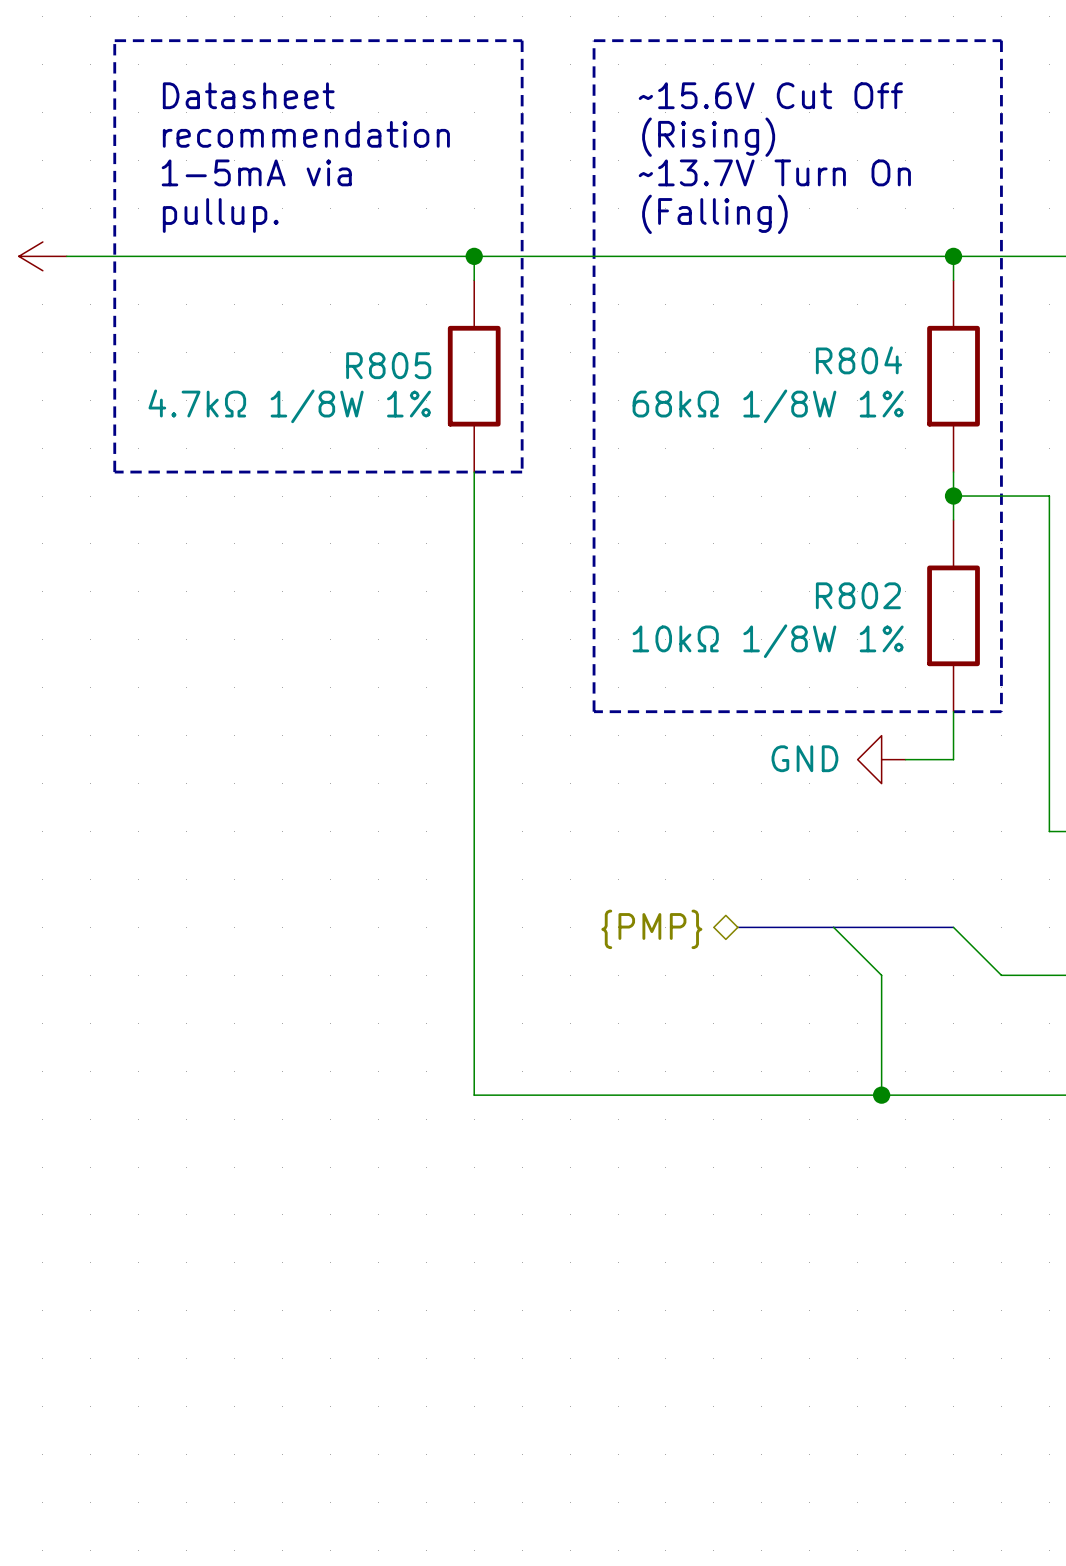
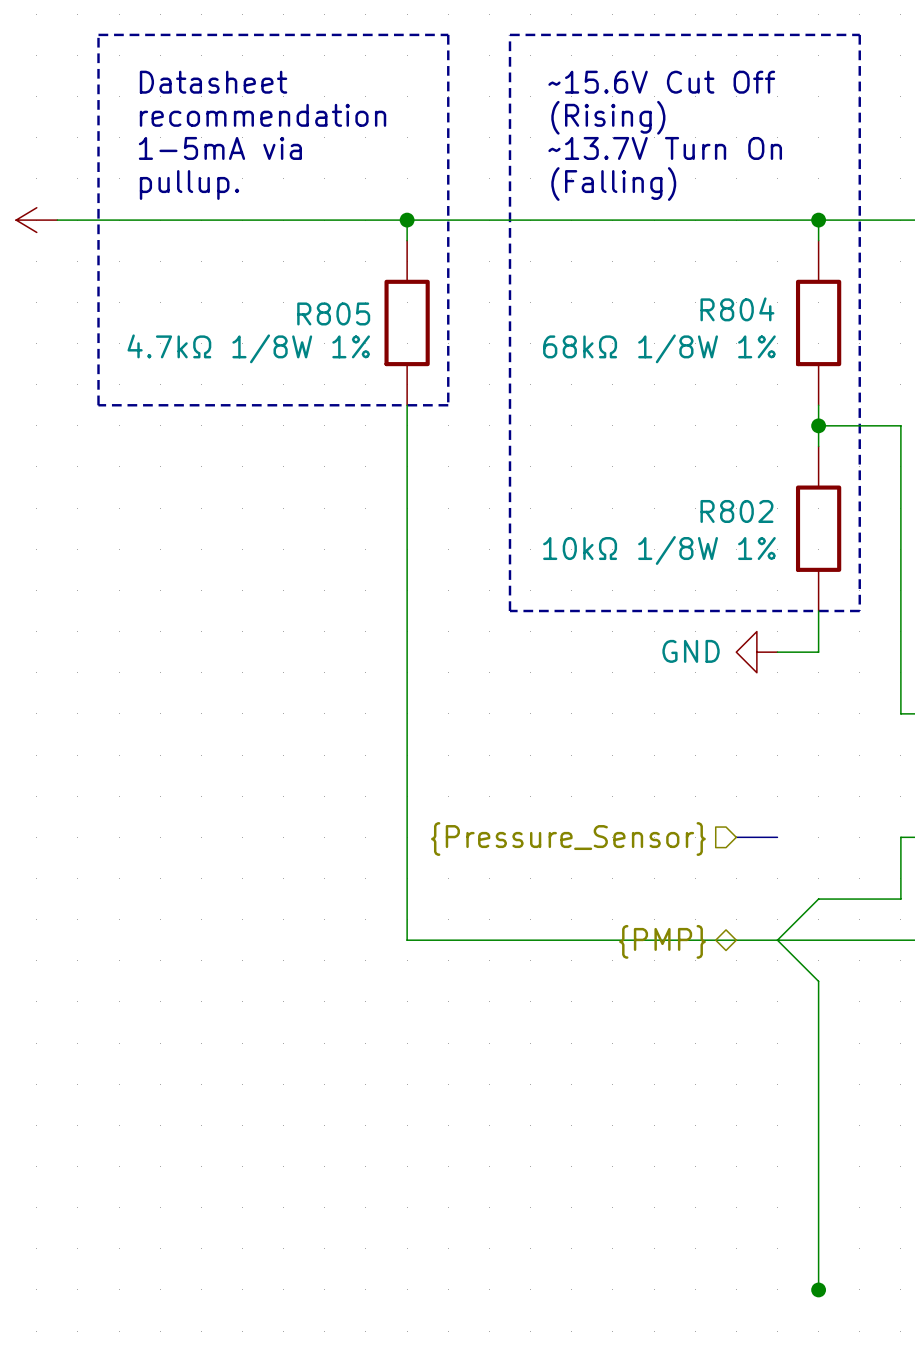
bus: (737, 927) (953, 927) -> none
wire: (833, 927) (881, 975) (881, 1095) -> none
wire: (953, 927) (1001, 975) (1049, 975) -> (818, 1289) (818, 981) (777, 940) (818, 899) (900, 899) (900, 837)
hierarchical label position: {PMP} (651, 929) -> {PMP} (662, 941)
bus: none -> (736, 837) (777, 837)
hierarchical label: none -> {Pressure_Sensor} (568, 839)
junction: (881, 1095) -> none
junction: none -> (818, 1289)

